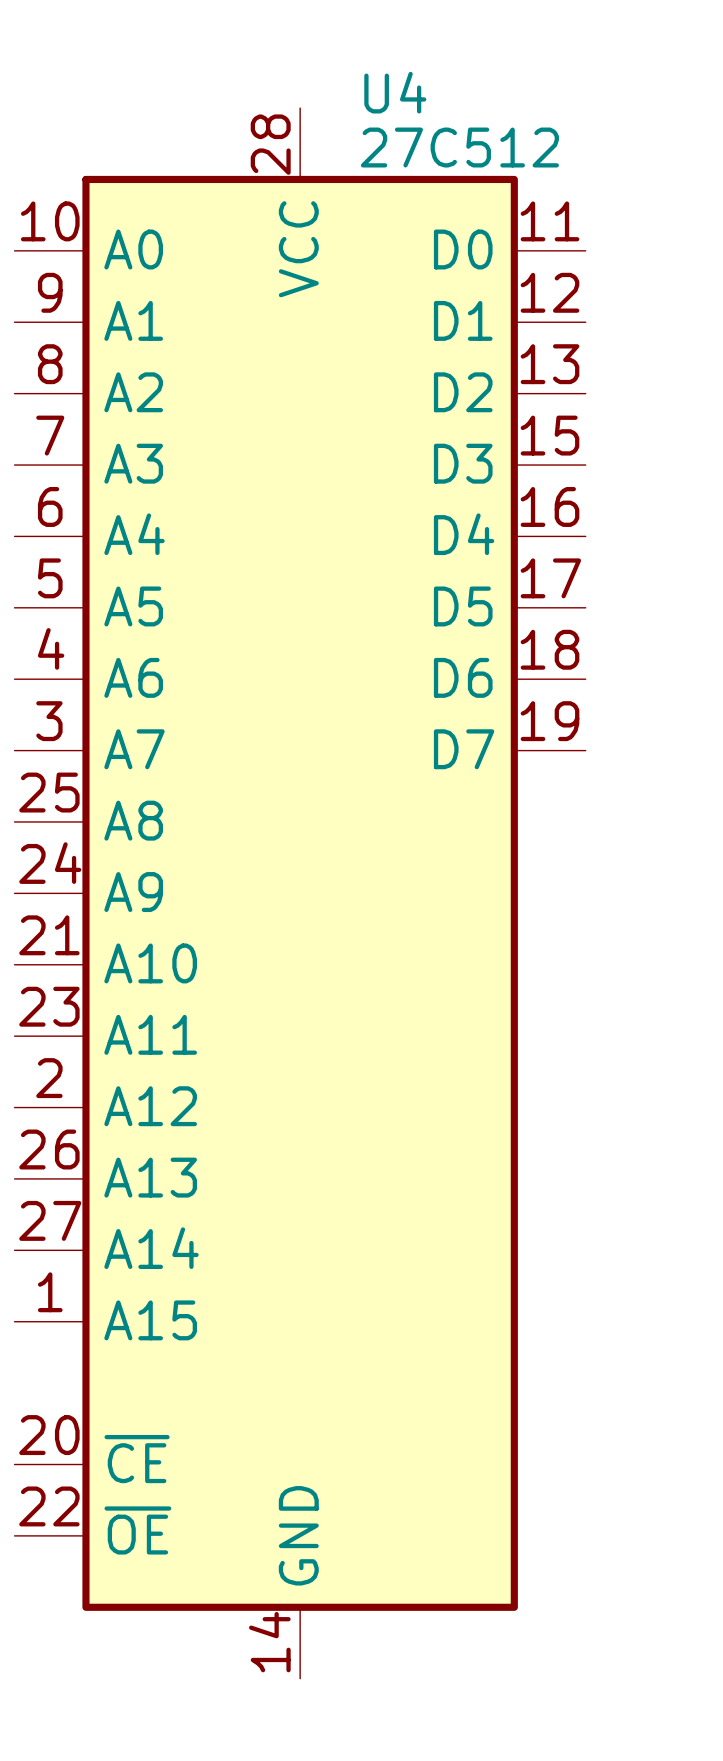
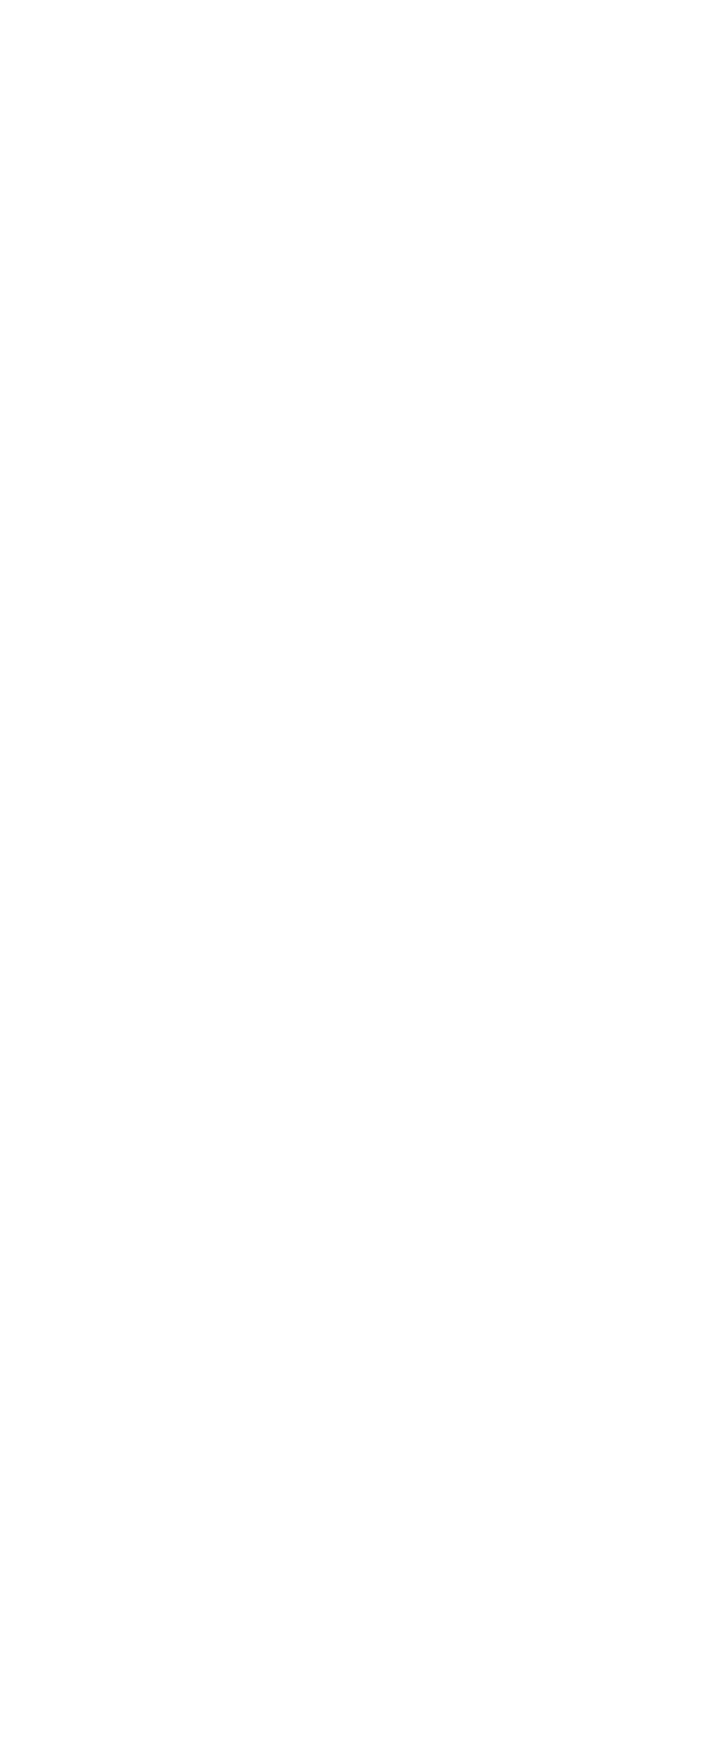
U4: 27C512 (300, 893) -> none

